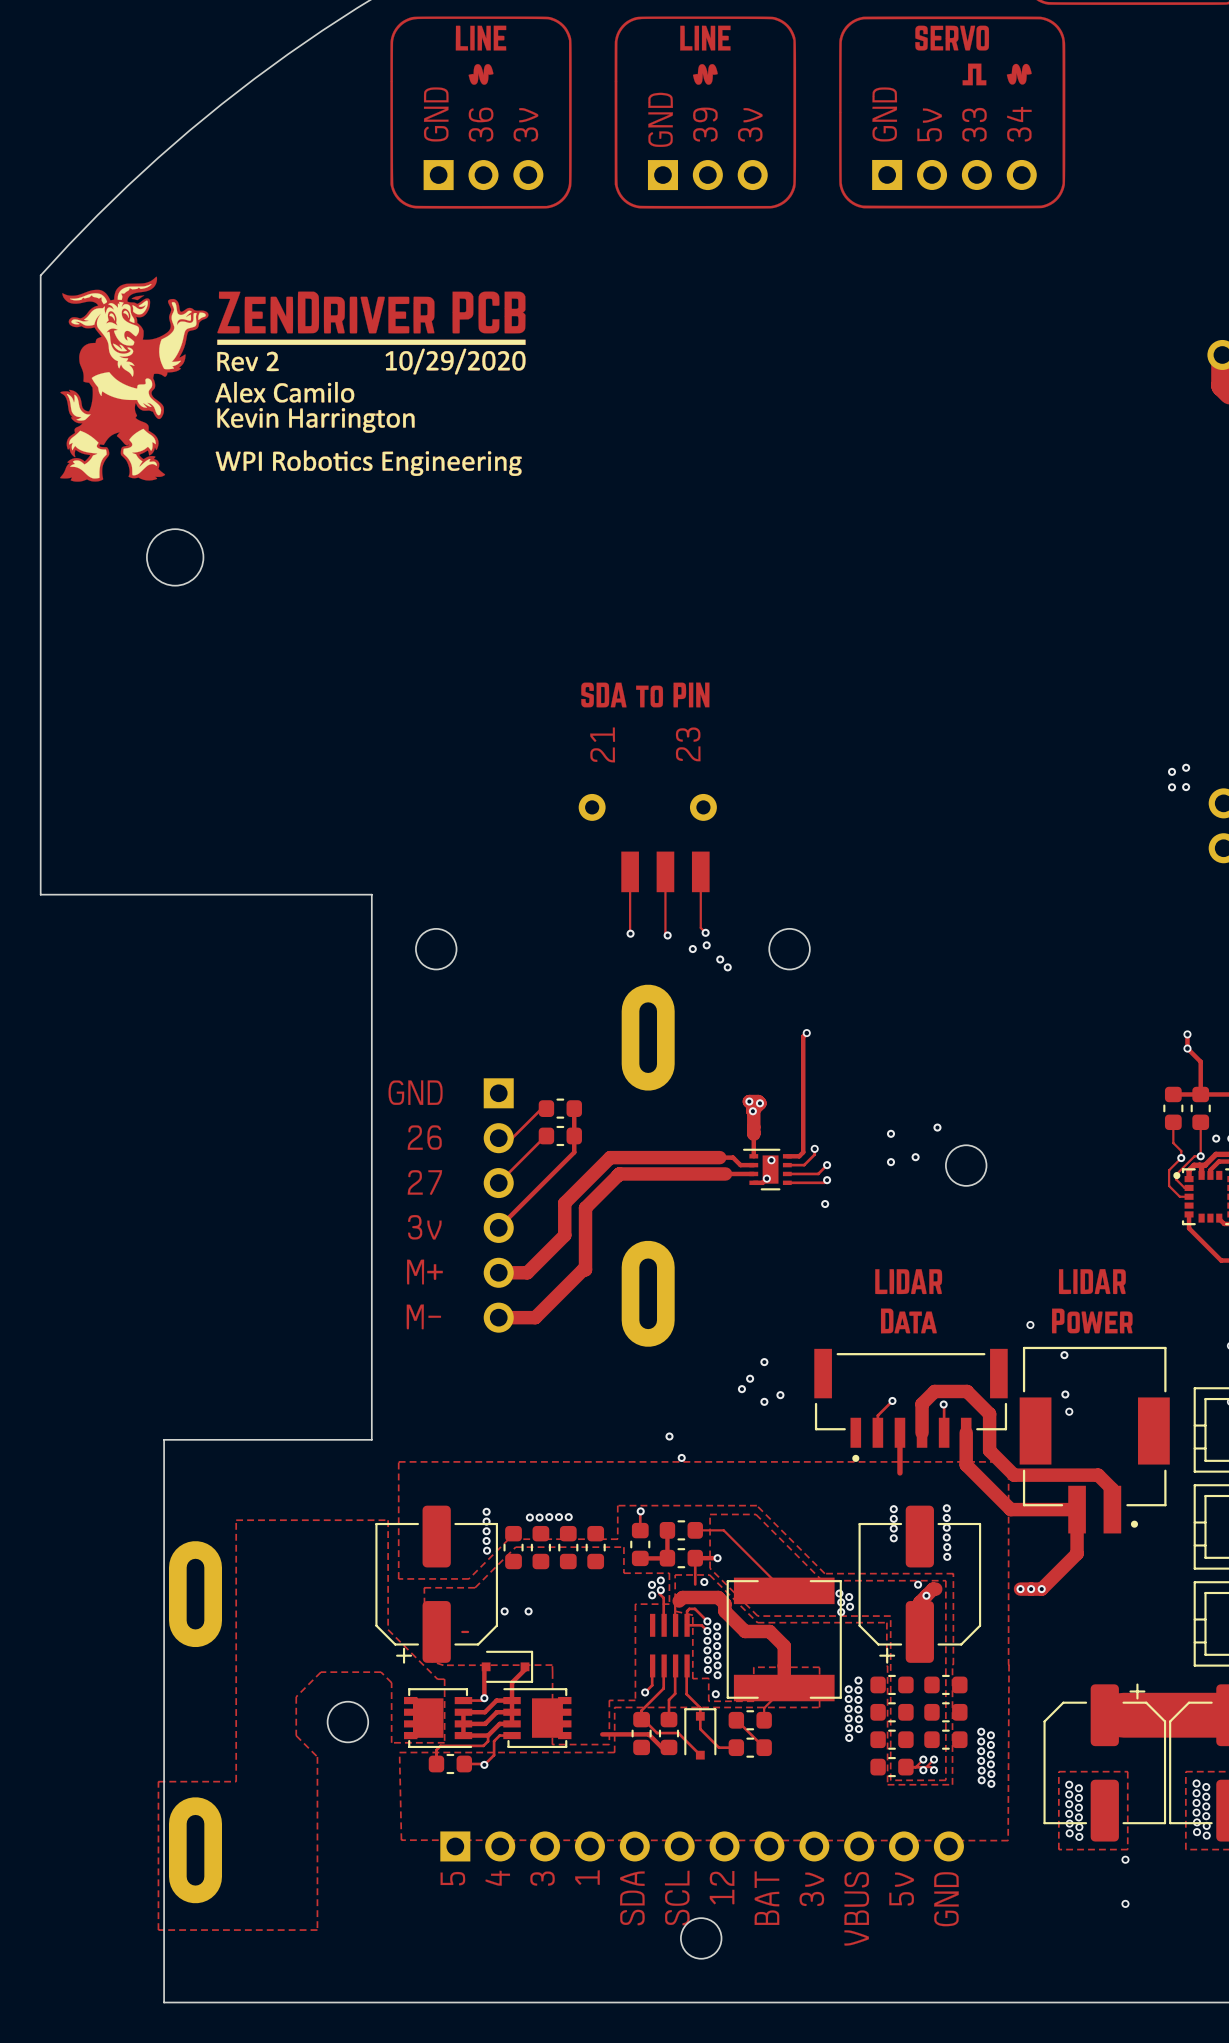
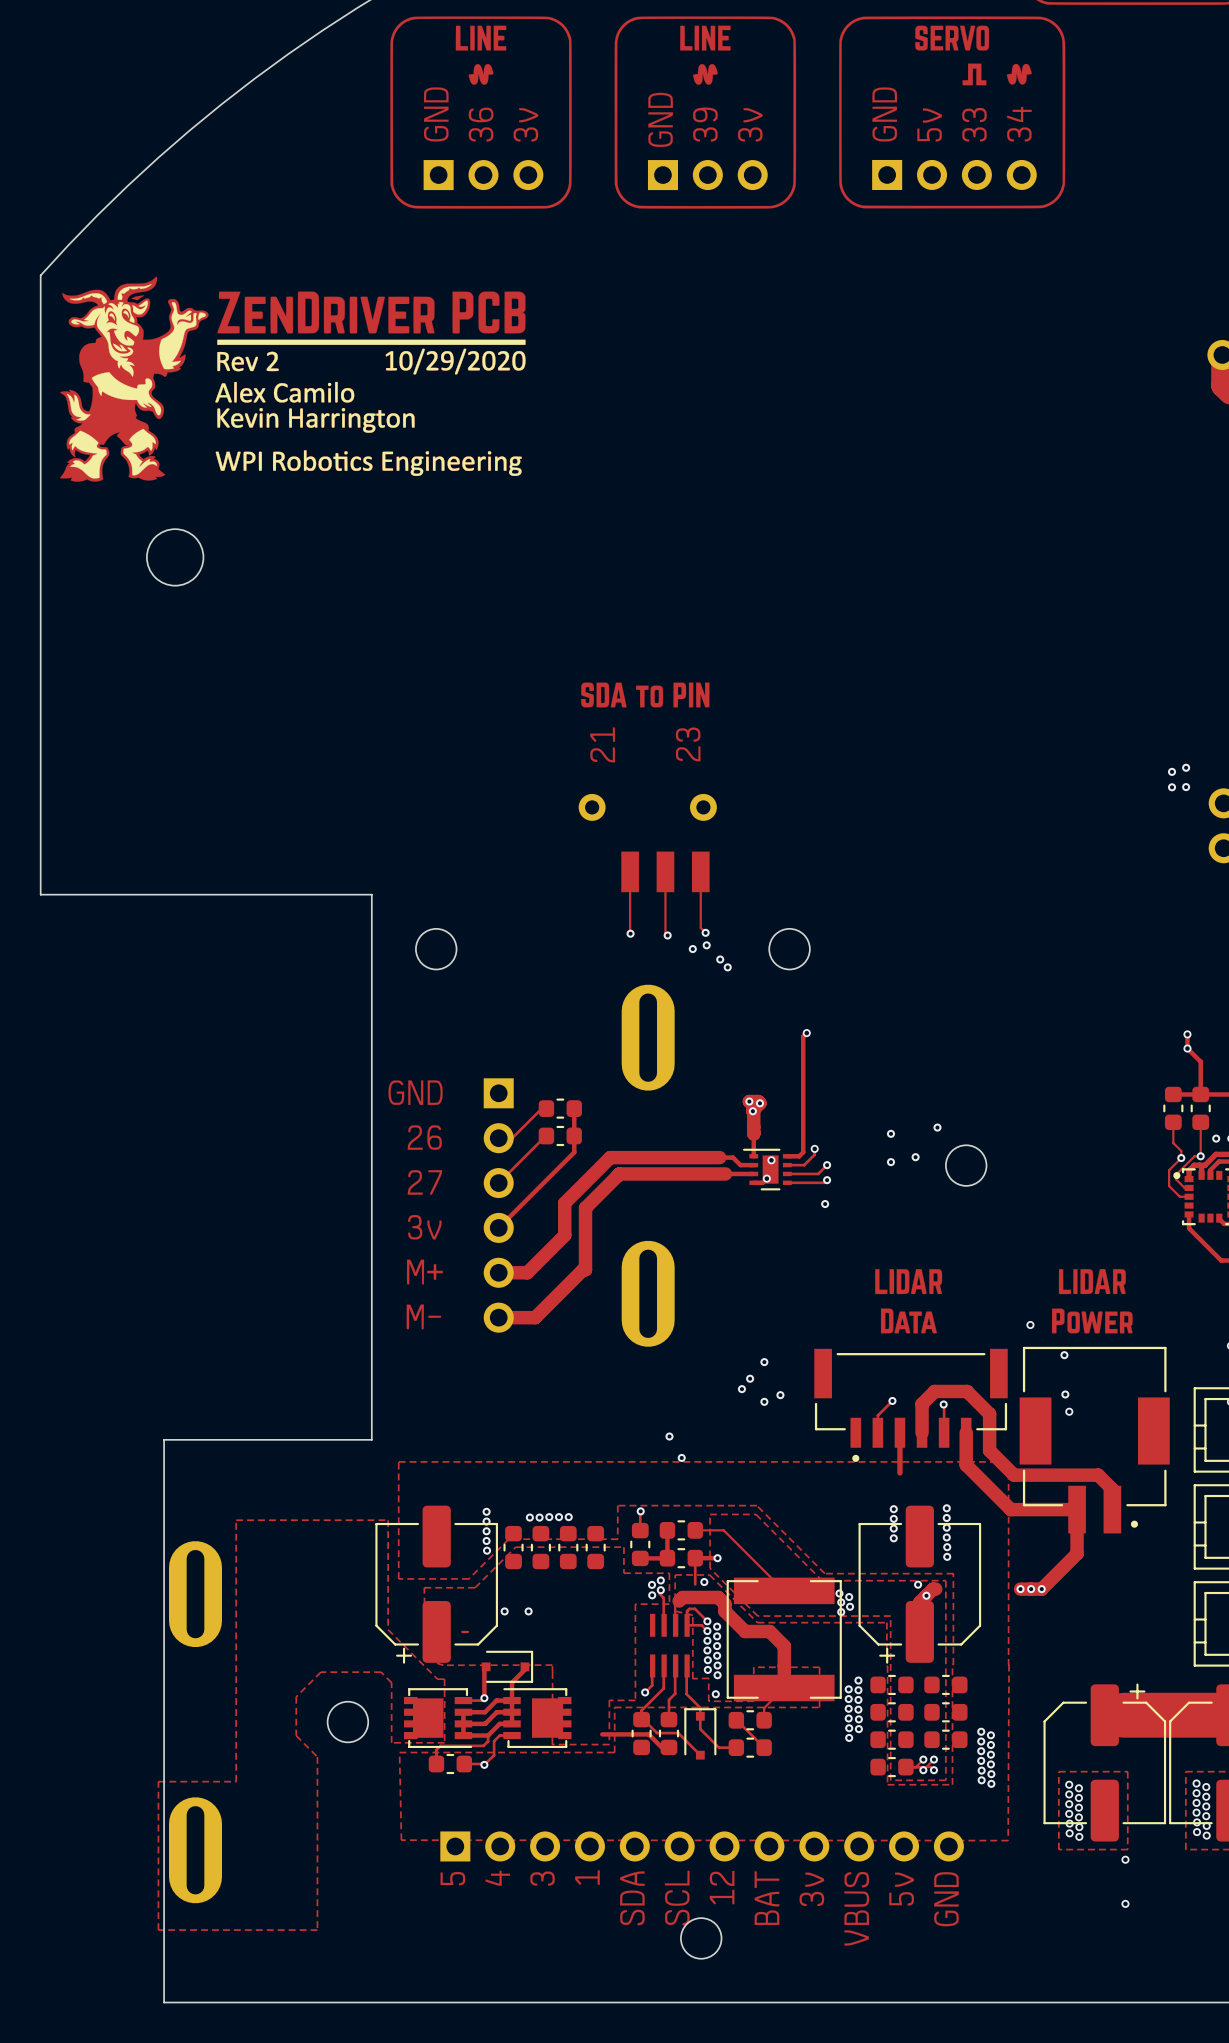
part footprint: [621, 984, 675, 1091] -> [621, 984, 675, 1091]
part footprint: [621, 1240, 675, 1347] -> [621, 1240, 675, 1347]
part footprint: [169, 1541, 223, 1648] -> [169, 1541, 223, 1648]
part footprint: [169, 1797, 223, 1904] -> [169, 1797, 223, 1904]

